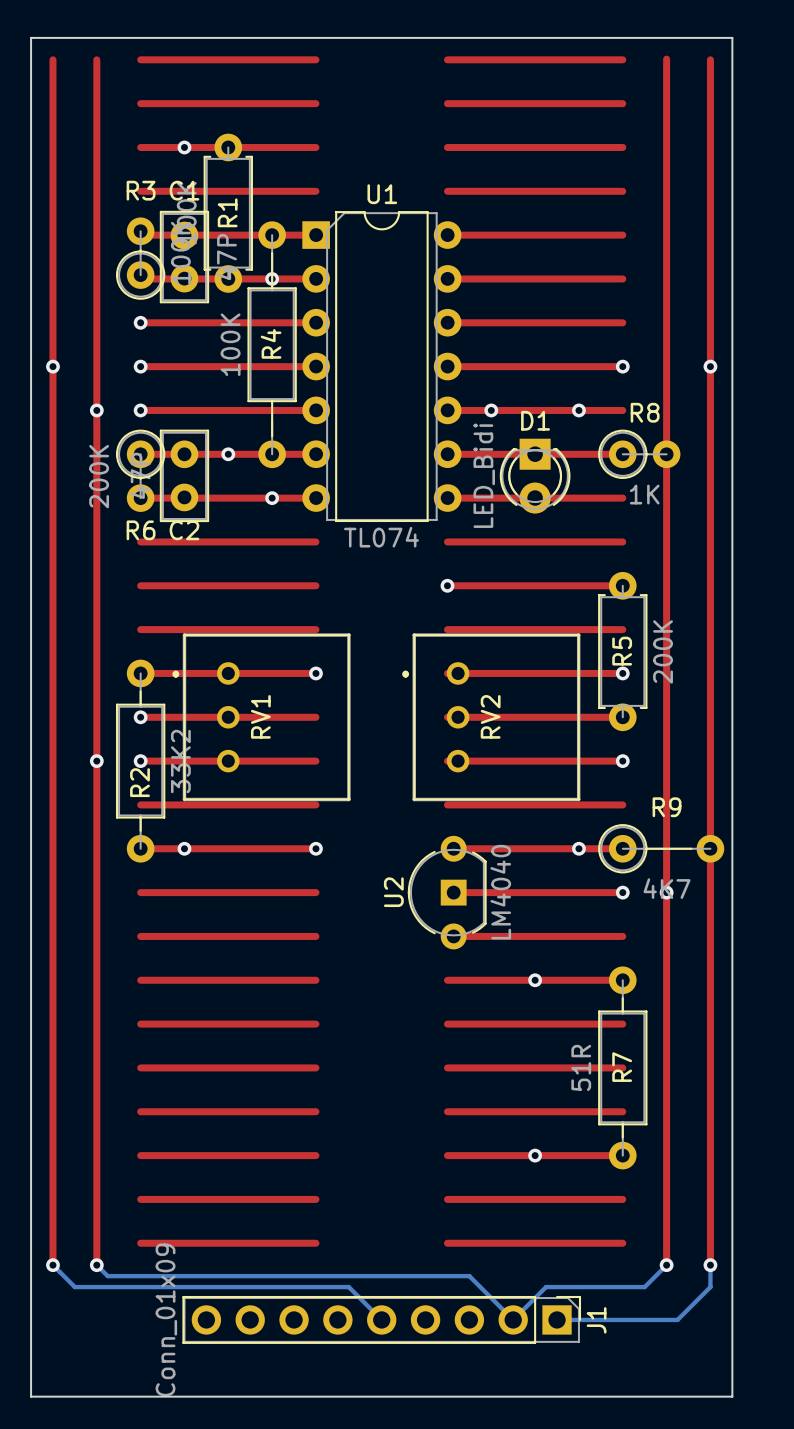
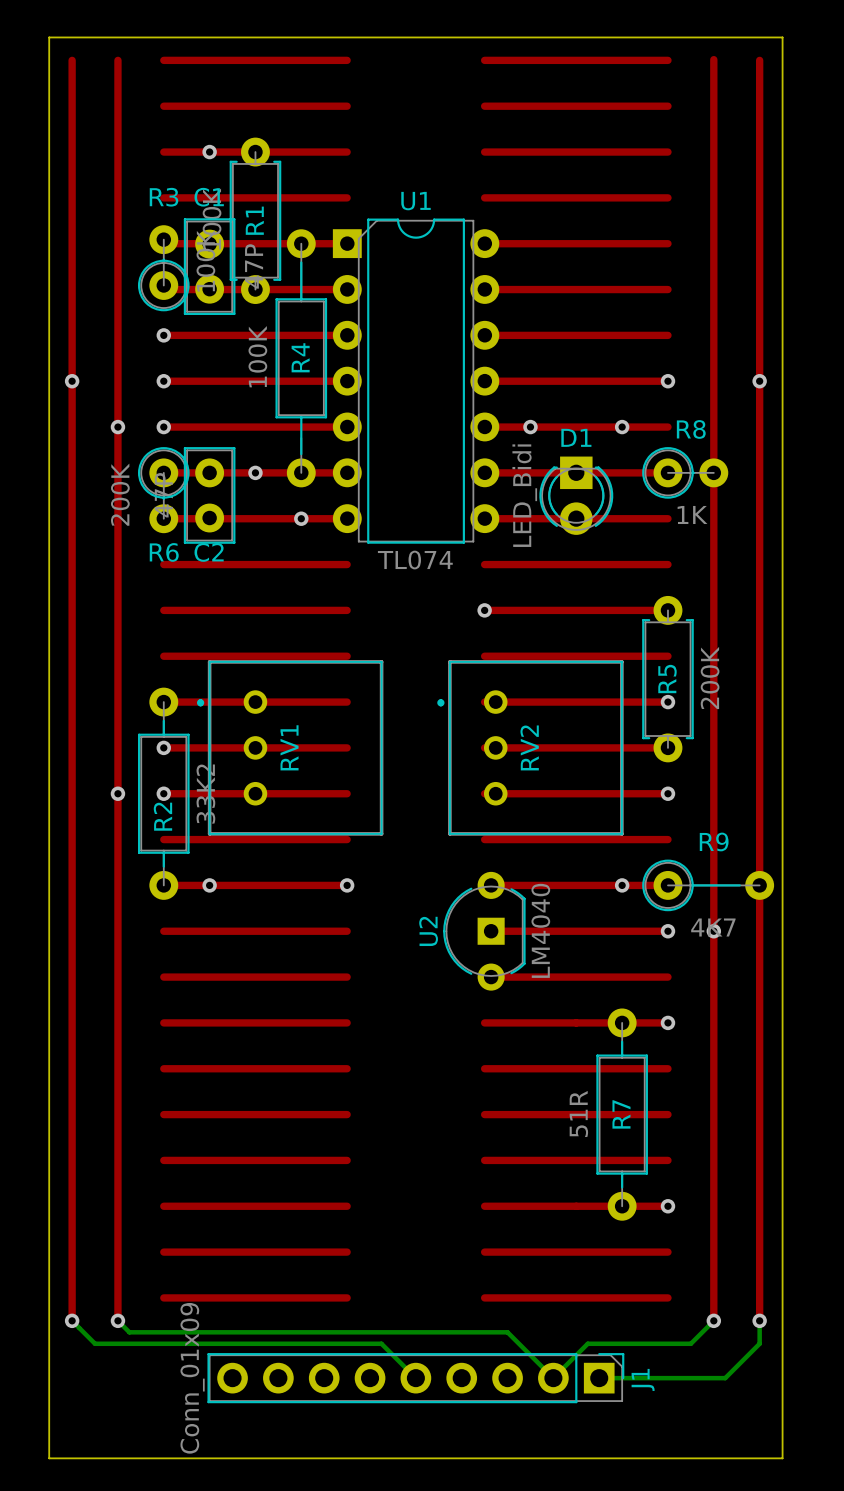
via: (272, 278) -> none
via: (315, 673) -> none
via position: (535, 980) -> (667, 1022)
R7 position: (622, 1067) -> (622, 1114)
via position: (535, 1155) -> (667, 1206)

